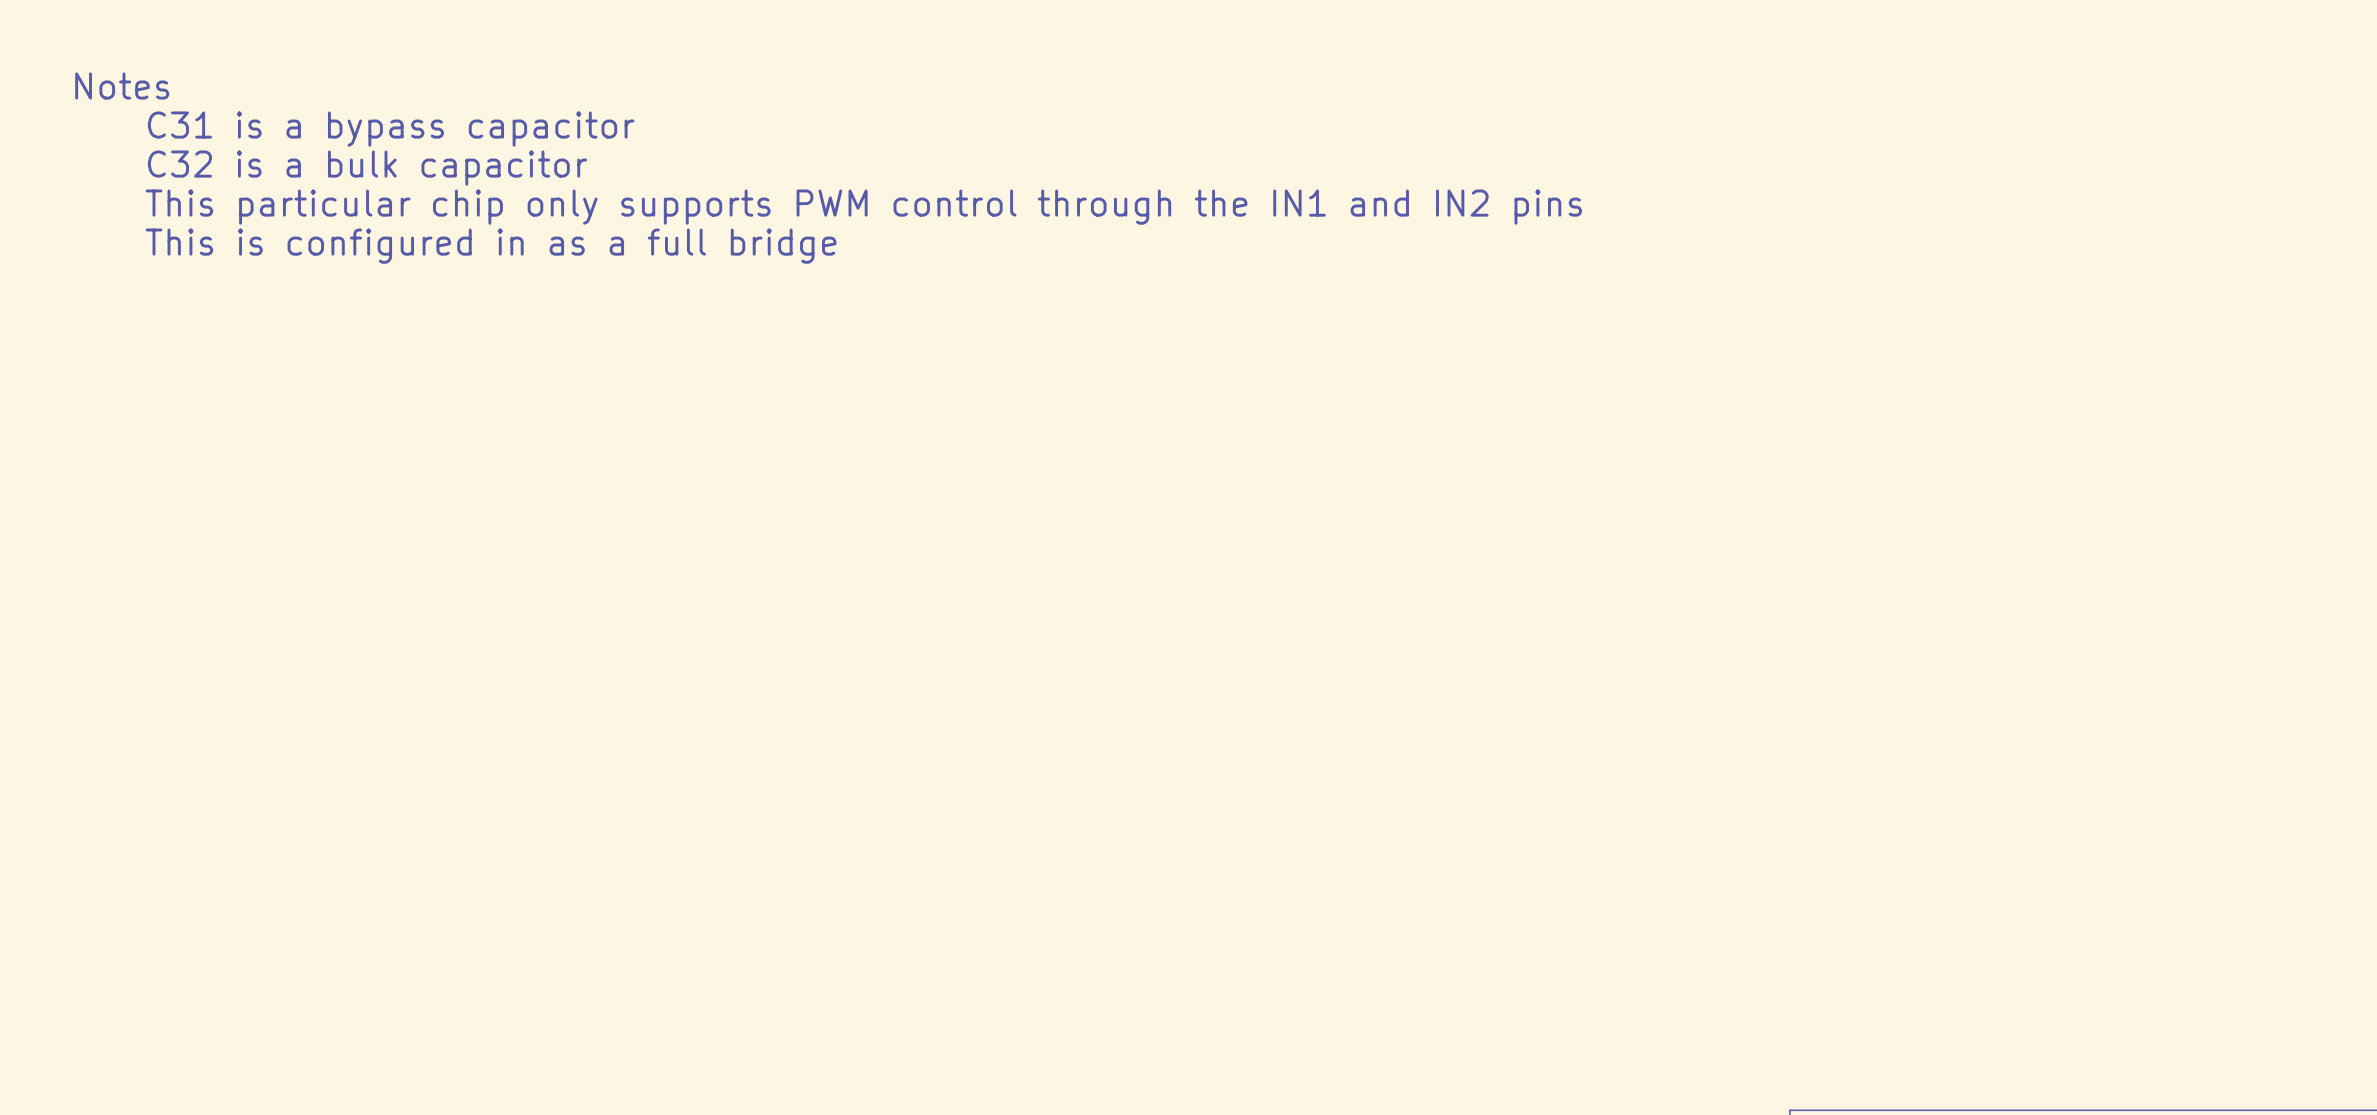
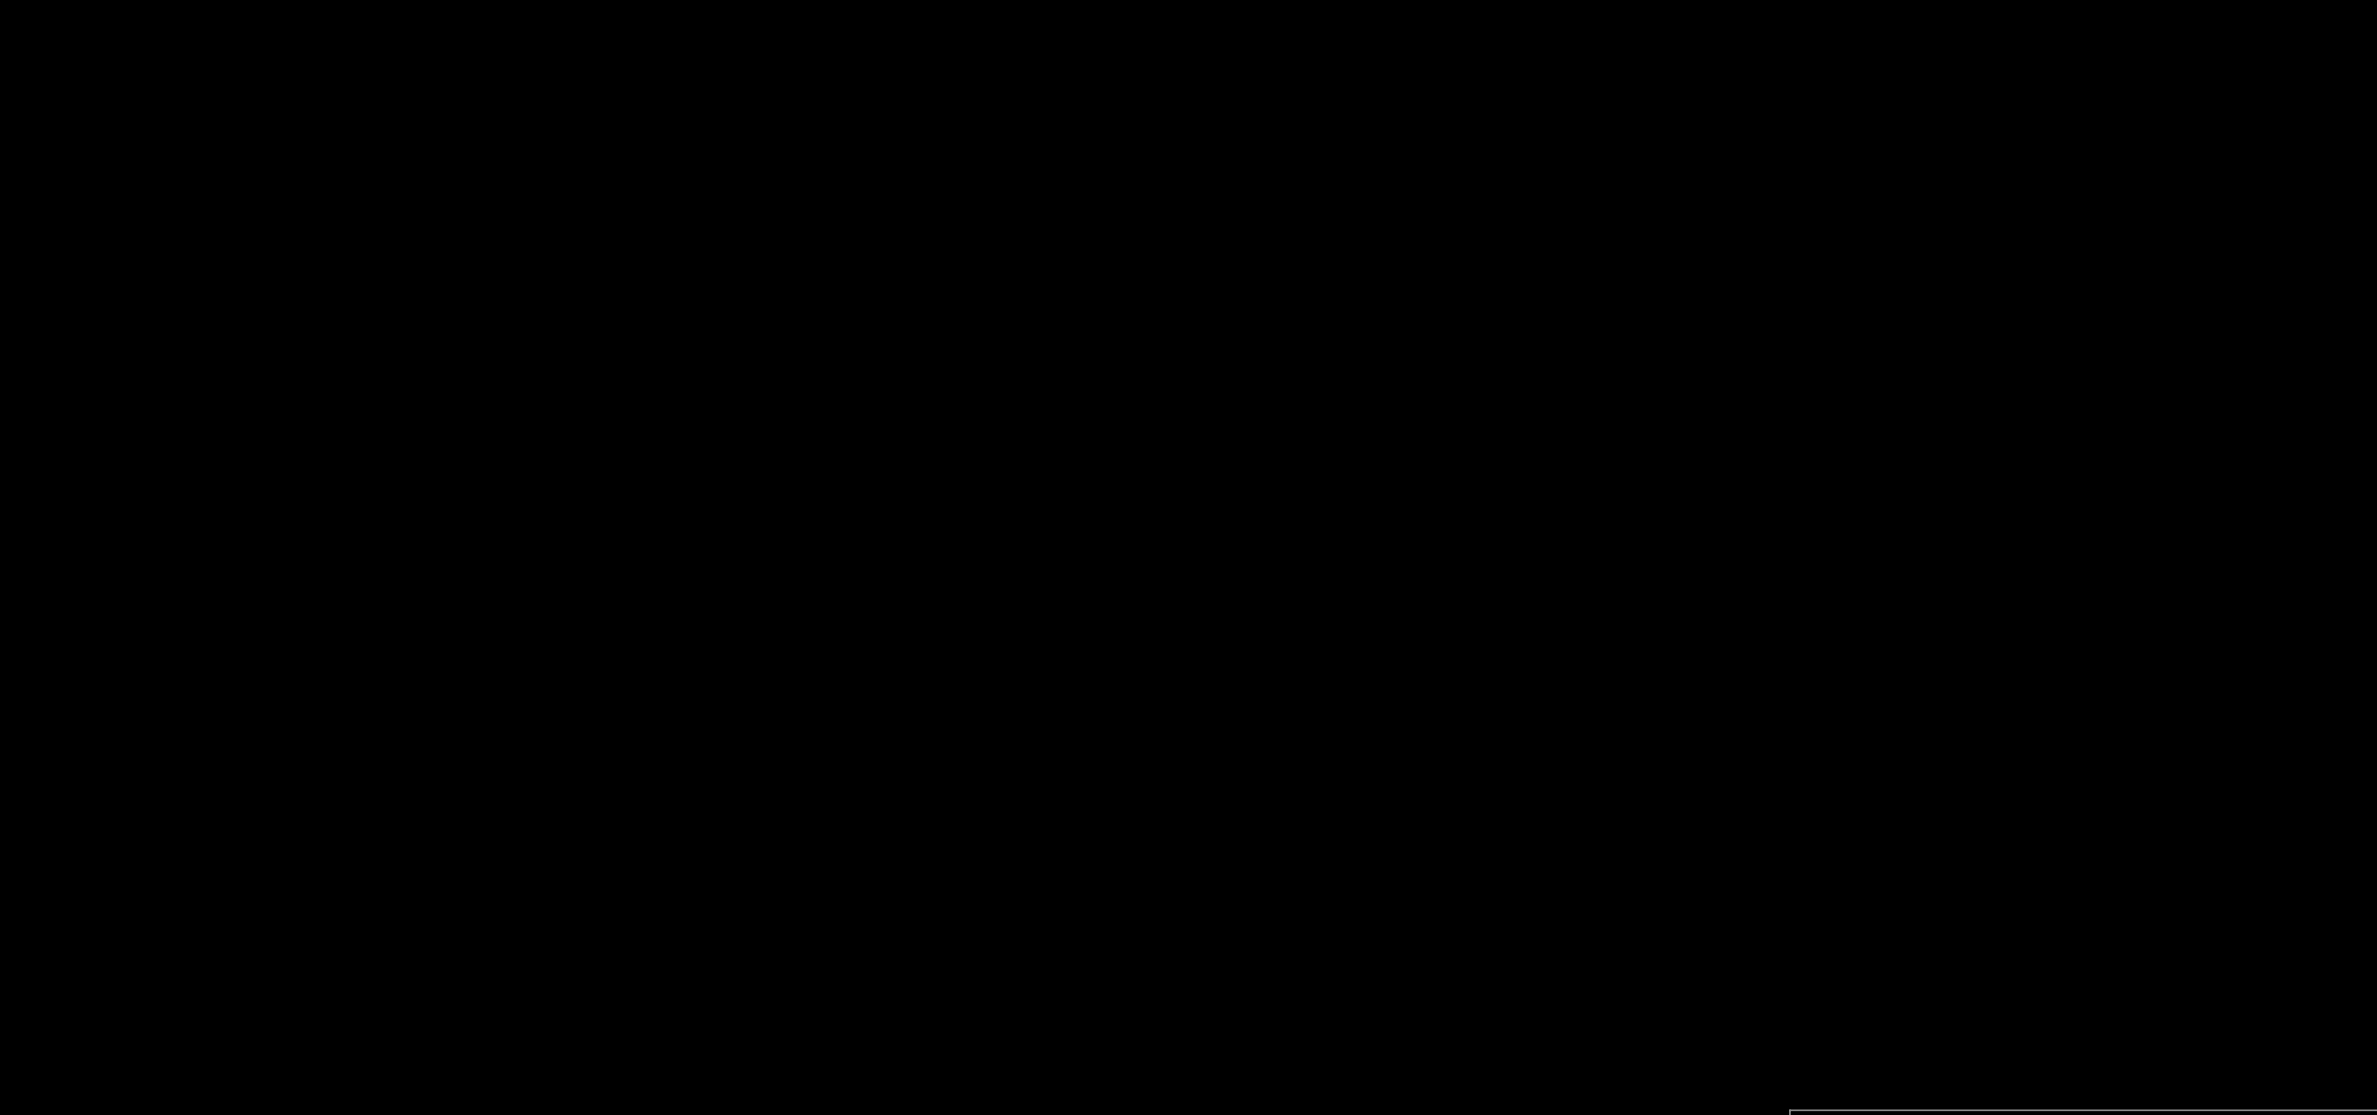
text: Notes (122, 86) -> none
text: C31 is a bypass capacitor (391, 129) -> none
text: C32 is a bulk capacitor (367, 168) -> none
text: This particular chip only supports PWM control through the IN1 and IN2 pins (863, 207) -> none
text: This is configured in as a full bridge (491, 246) -> none

